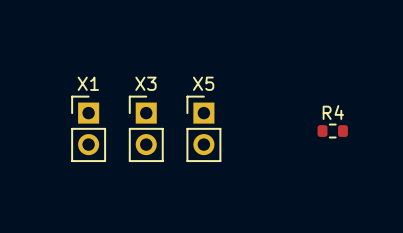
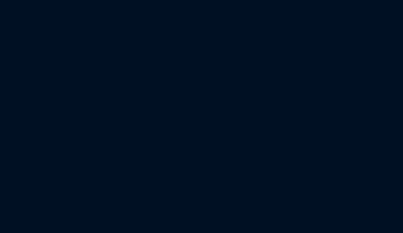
X1: (88, 128) -> none
X3: (146, 128) -> none
X5: (203, 128) -> none
R4: (332, 131) -> none

